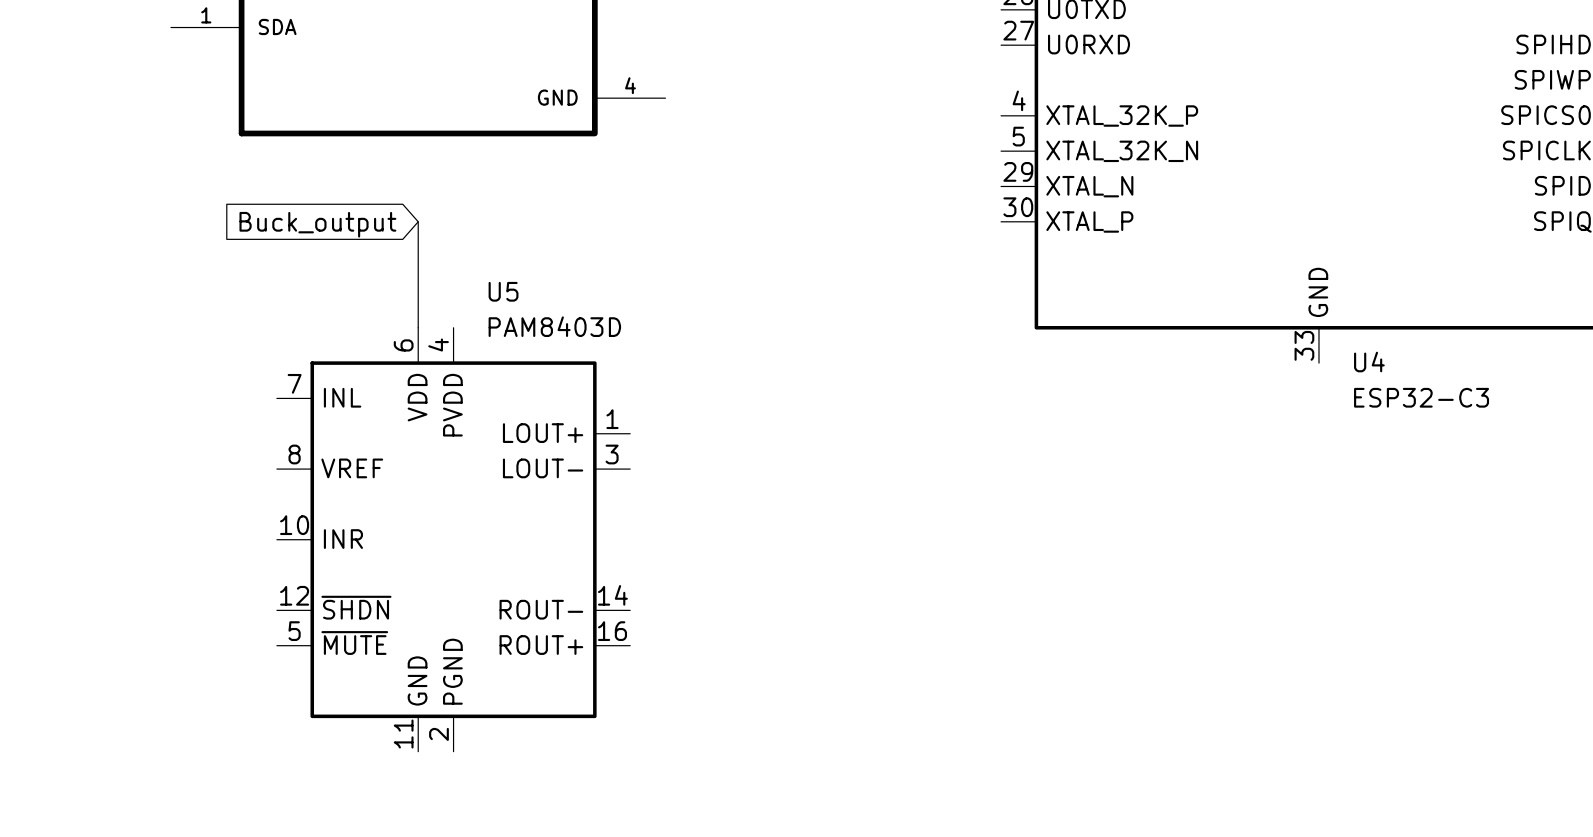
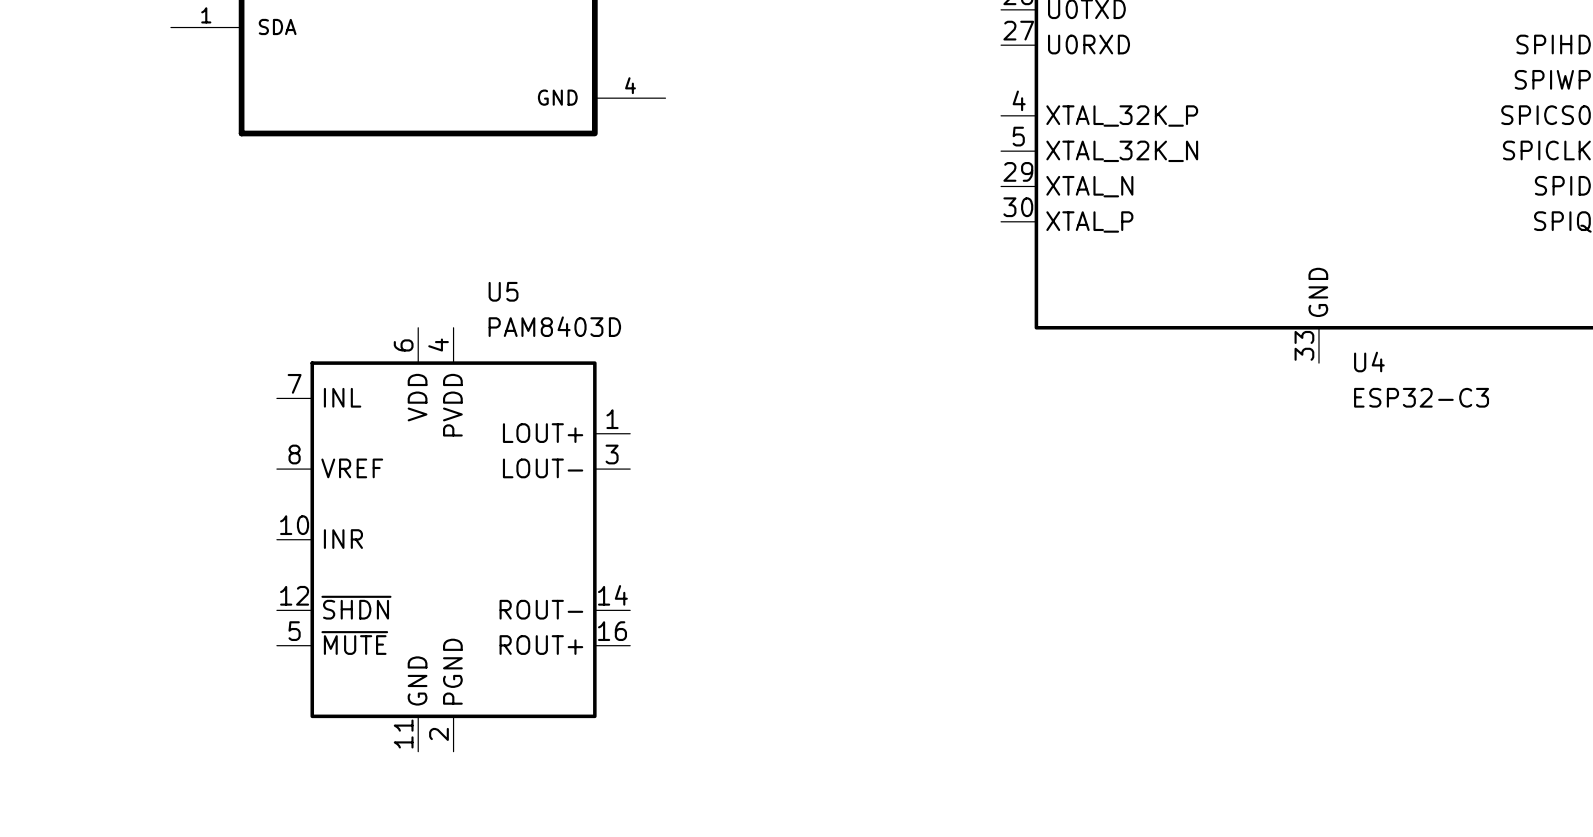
wire: (418, 221) (418, 327) -> none
global label: Buck_output (317, 224) -> none

